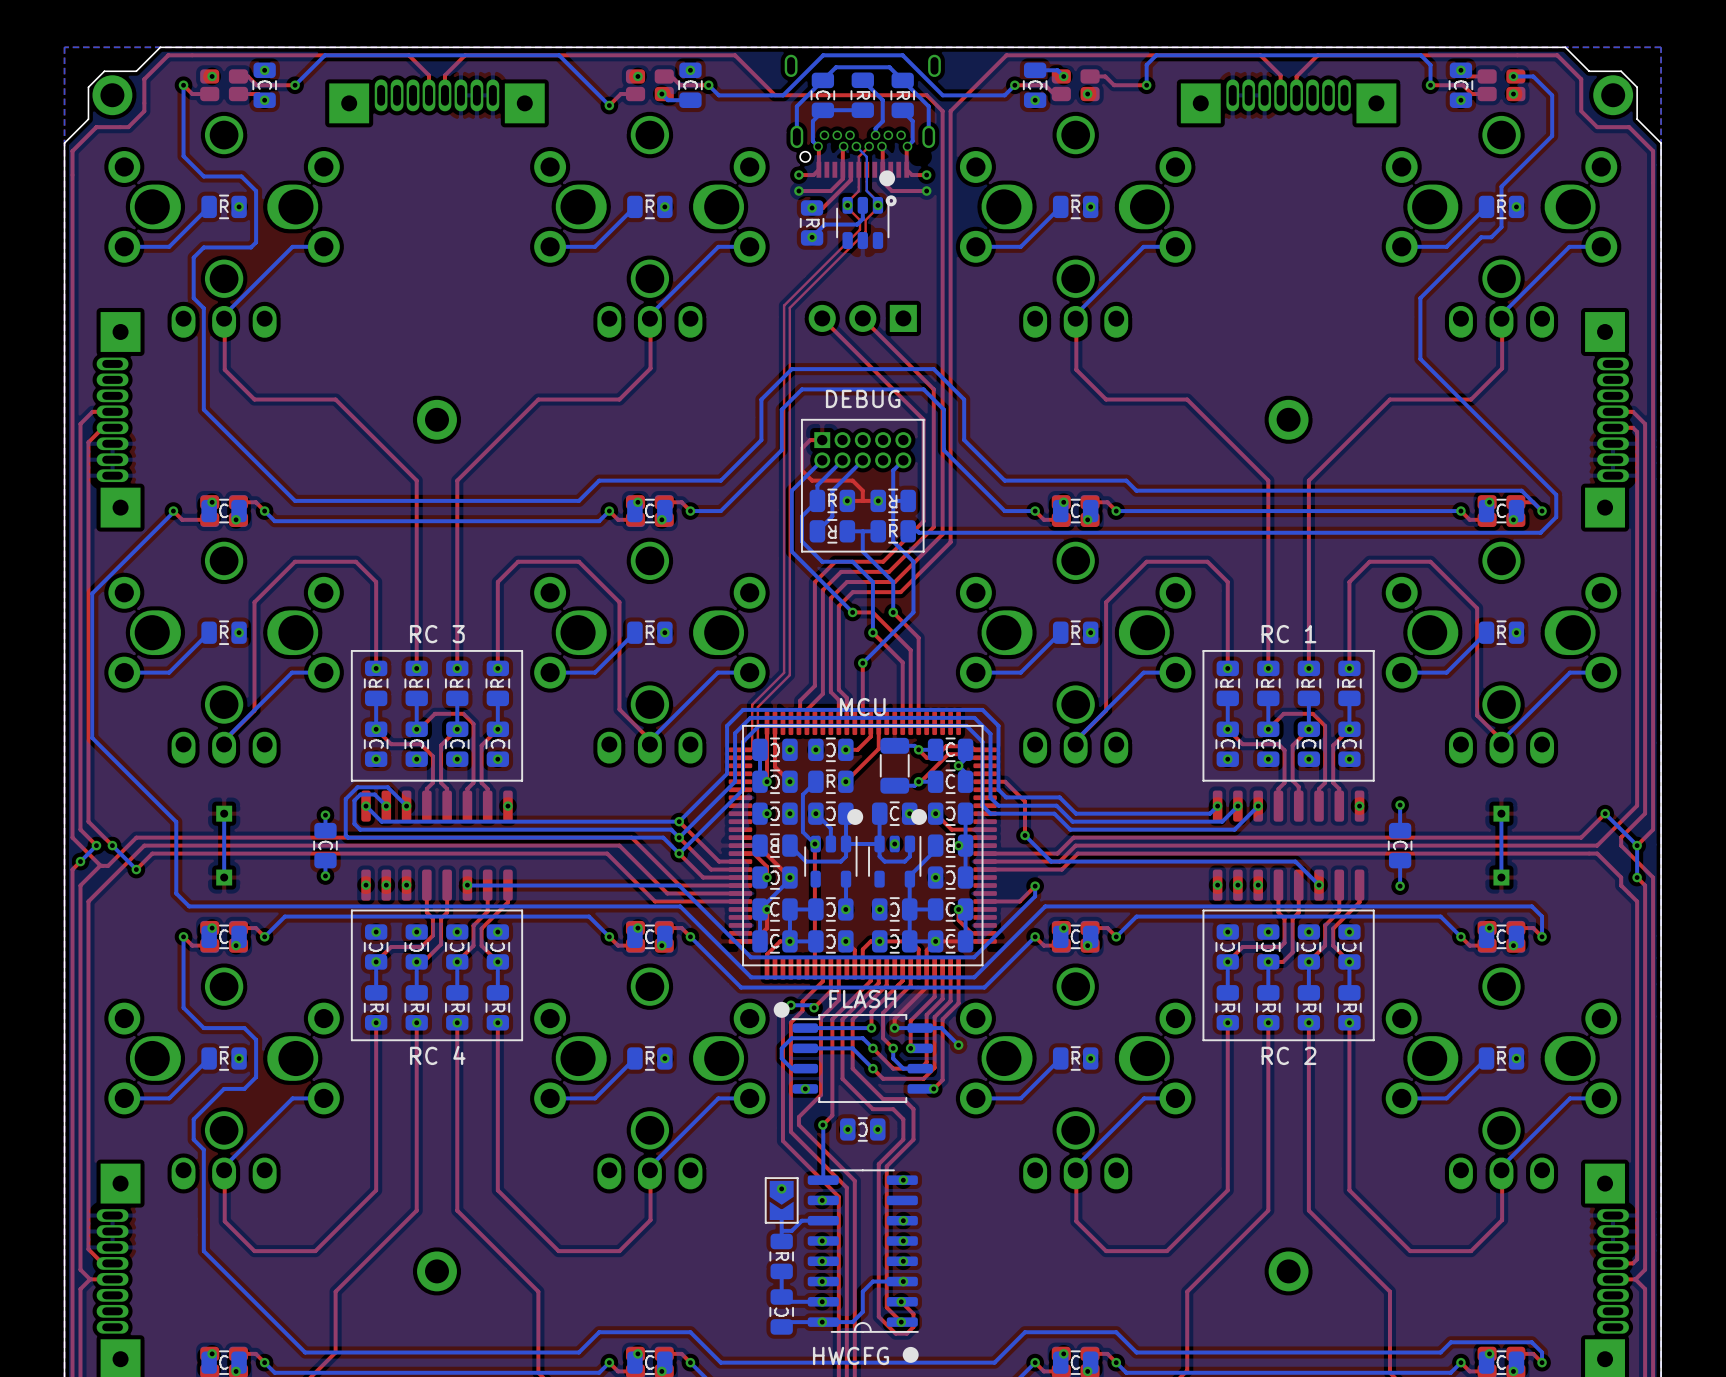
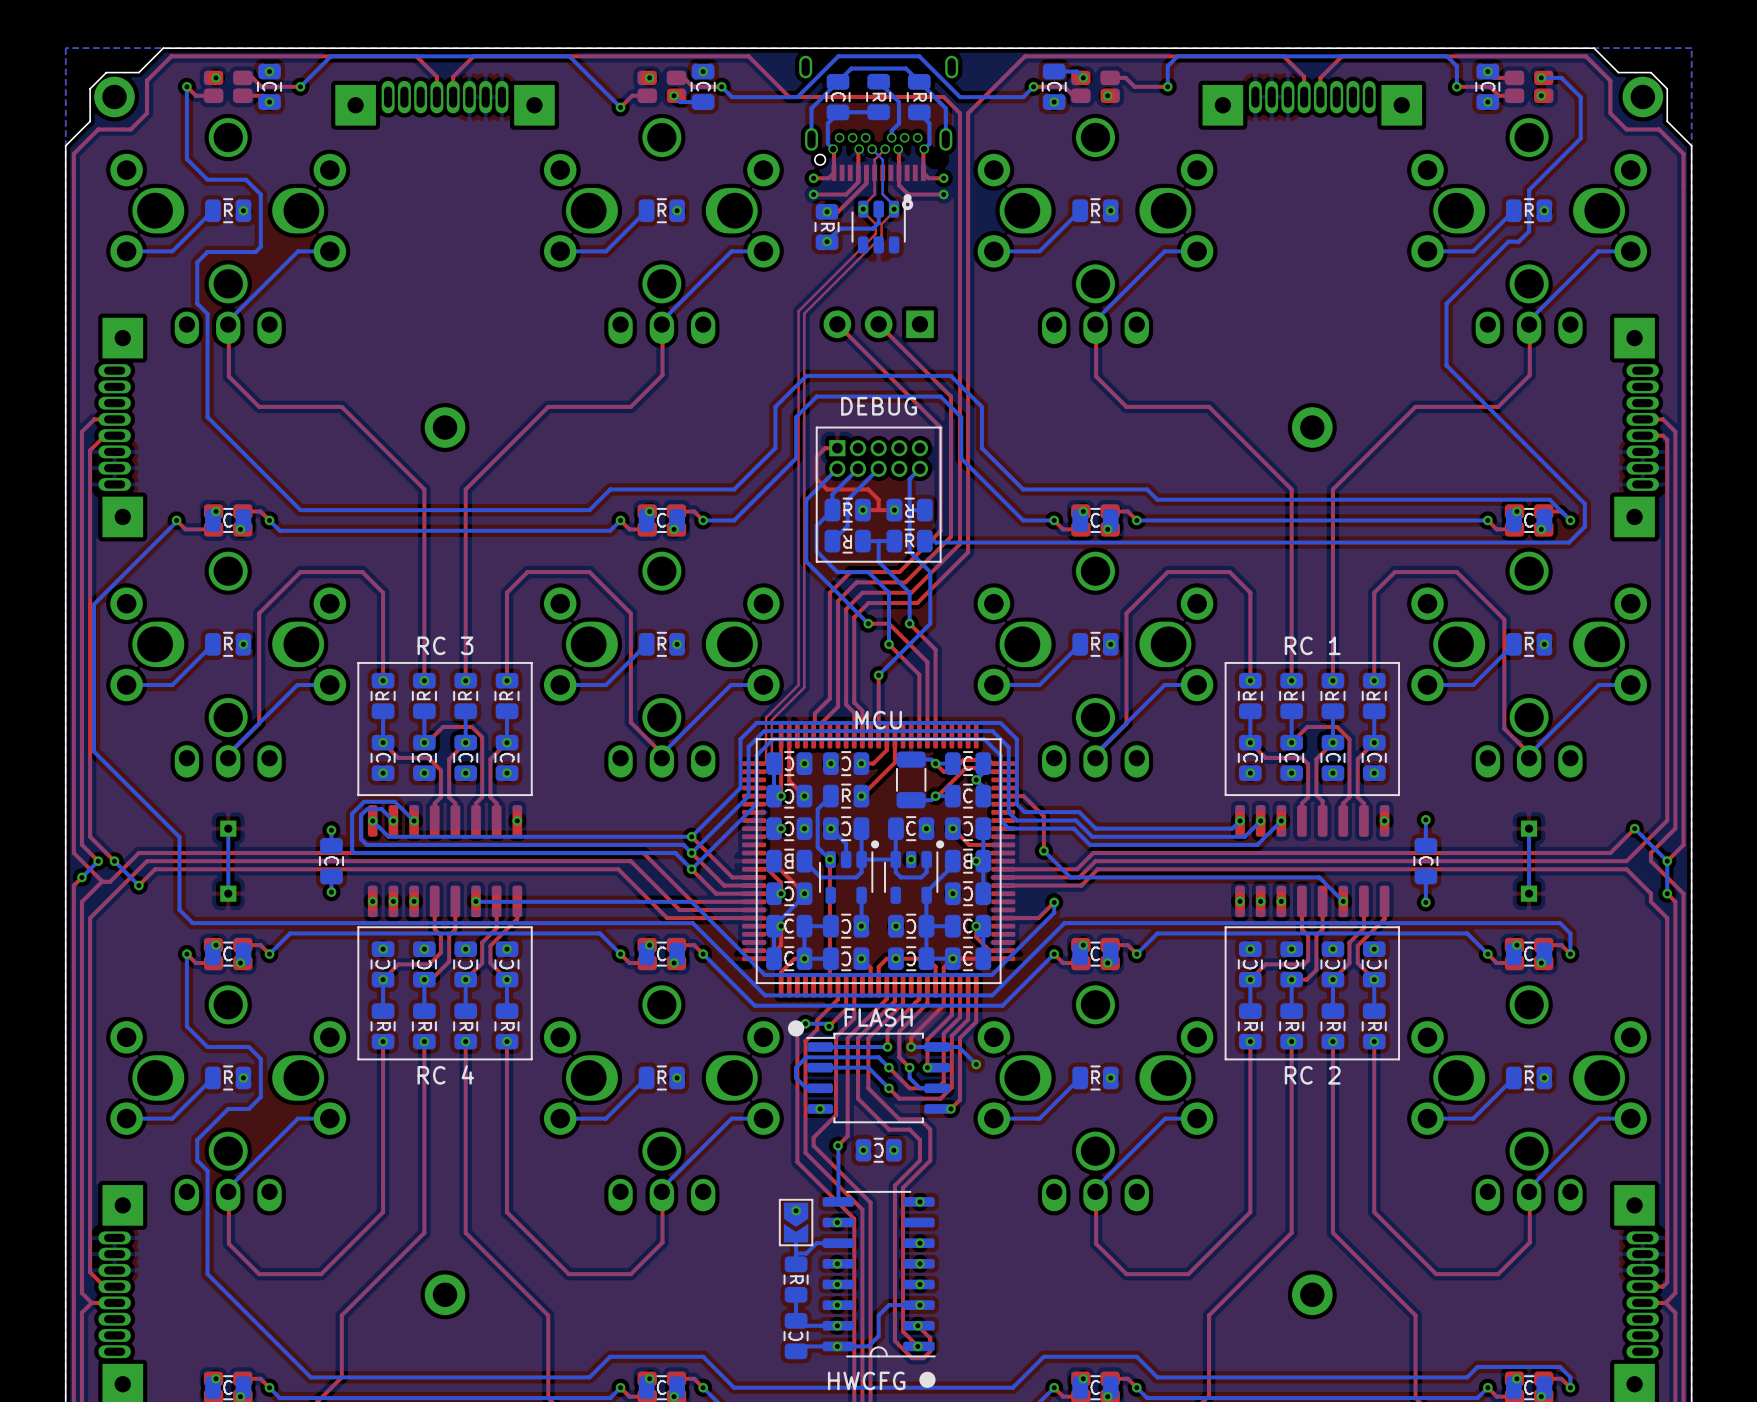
part footprint: [836, 170, 896, 249] -> [851, 194, 912, 254]
part footprint: [804, 808, 864, 888] -> [819, 840, 880, 904]
part footprint: [868, 808, 928, 888] -> [884, 840, 945, 904]

